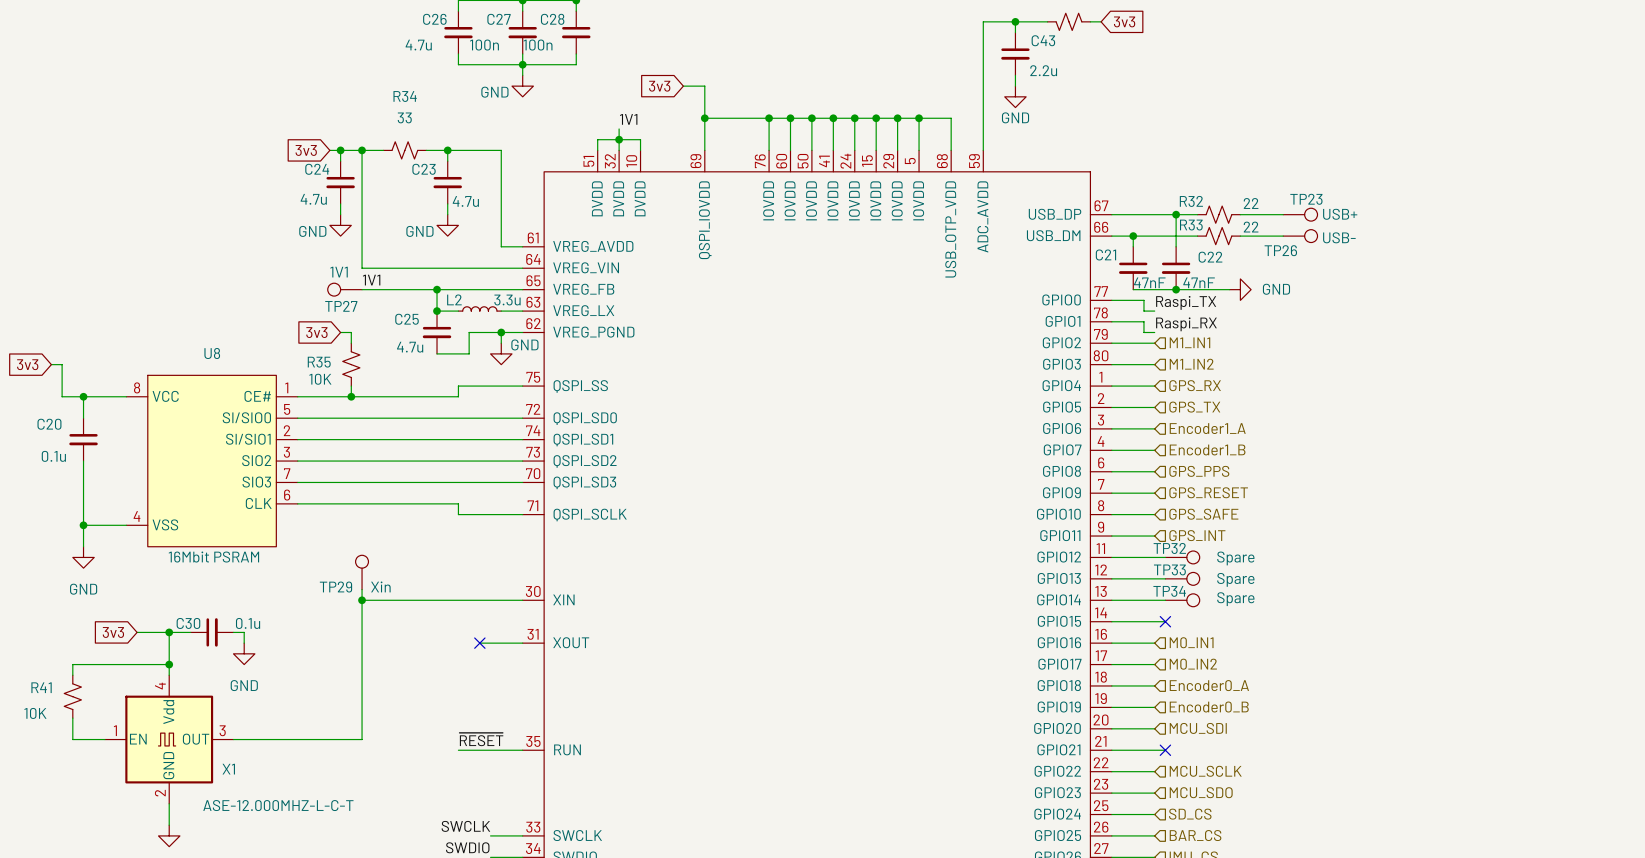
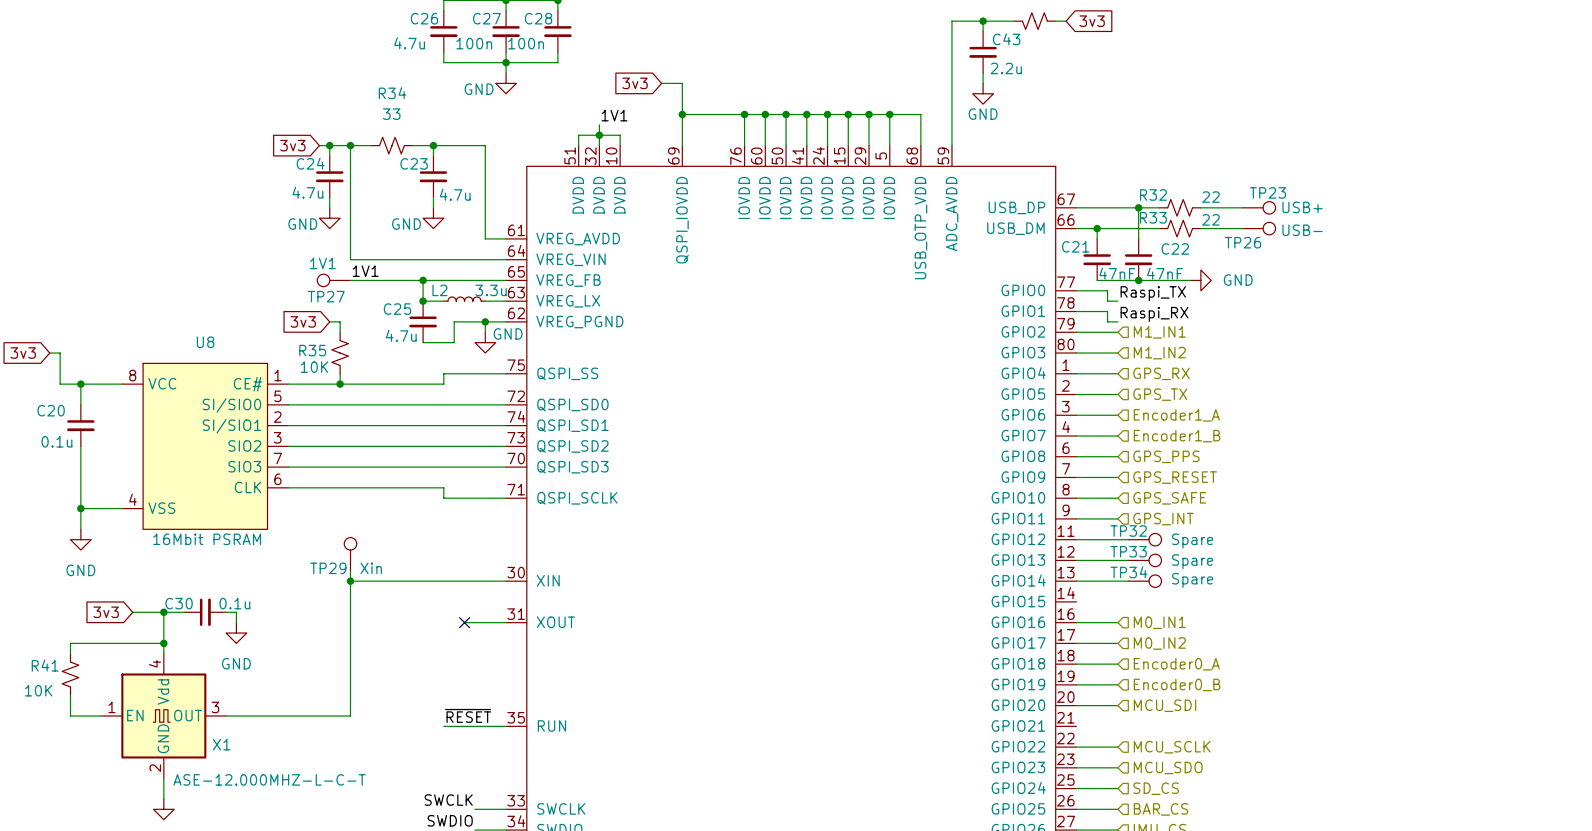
wire: (1111, 621) (1165, 621) -> none
no-connect mark: (1165, 621) -> none
wire: (1111, 750) (1165, 750) -> none
no-connect mark: (1165, 750) -> none

